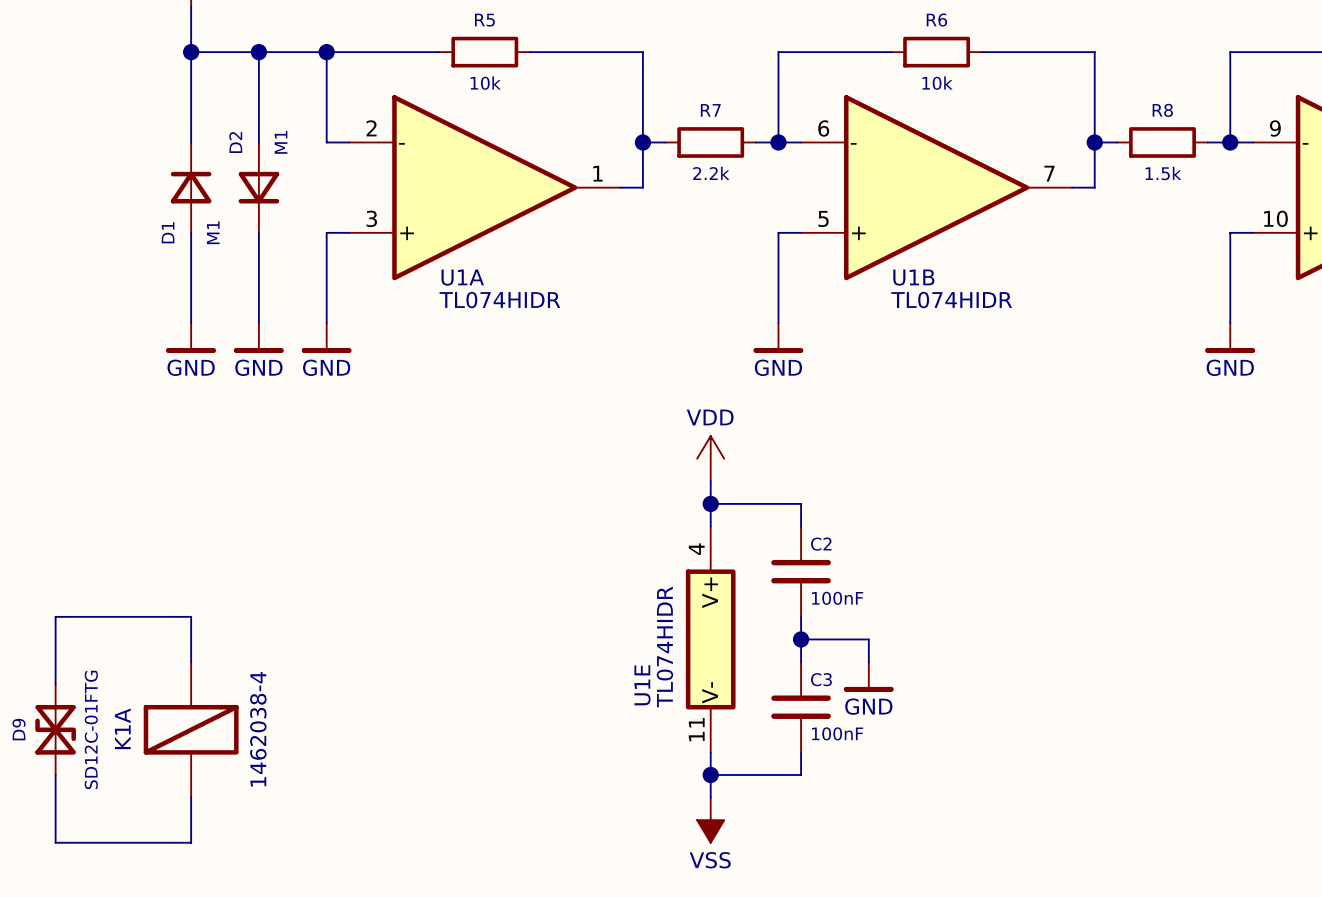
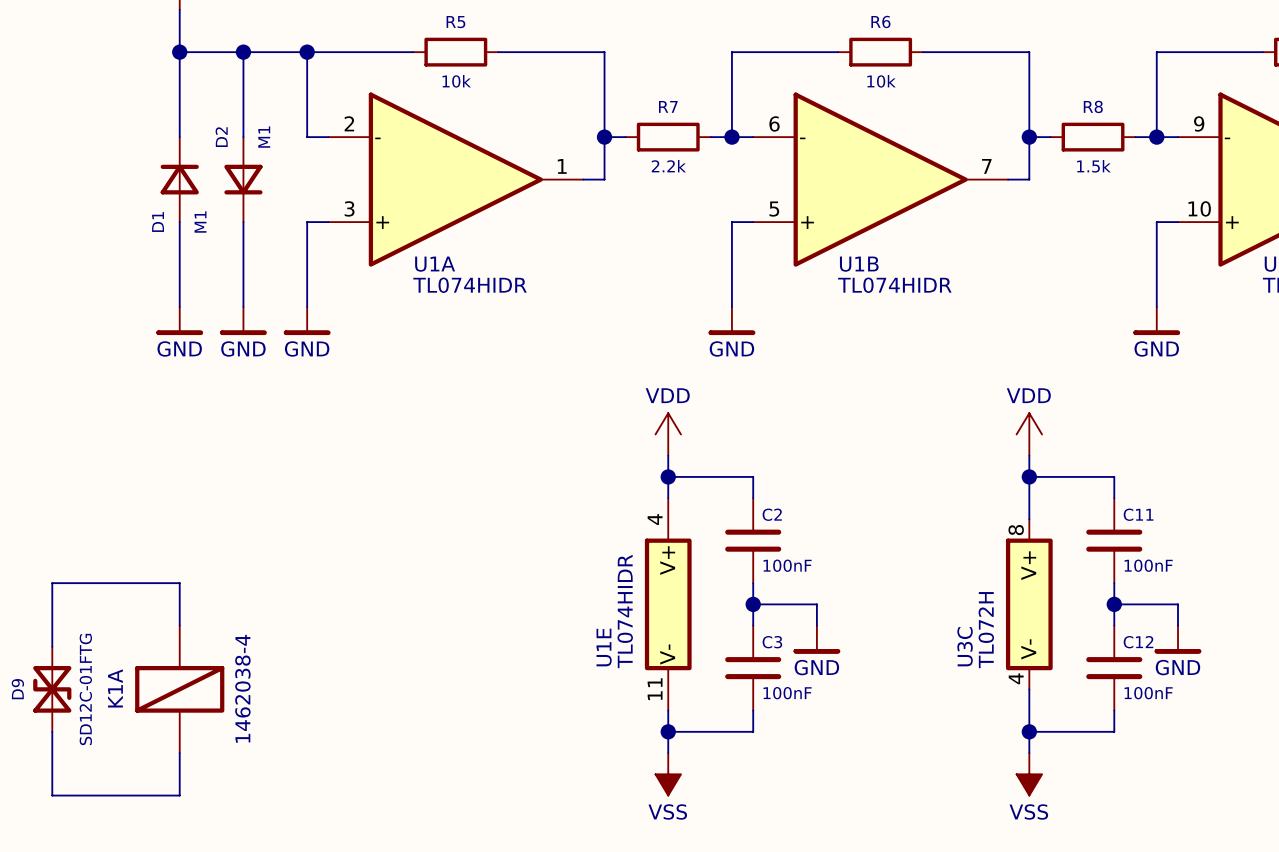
power symbol: none -> VDD (1029, 434)
wire: none -> (1029, 455) (1029, 519)
wire: none -> (1029, 476) (1114, 476) (1114, 498)
junction: none -> (1029, 476)
C11: none -> 100nF (1114, 540)
wire: none -> (1114, 583) (1114, 625)
U3C: none -> TL072H (1029, 604)
wire: none -> (1114, 604) (1178, 604) (1178, 625)
junction: none -> (1114, 604)
power symbol: none -> GND (1178, 639)
C12: none -> 100nF (1114, 668)
wire: none -> (1029, 689) (1029, 753)
wire: none -> (1114, 710) (1114, 731) (1029, 731)
junction: none -> (1029, 731)
power symbol: none -> VSS (1029, 774)

